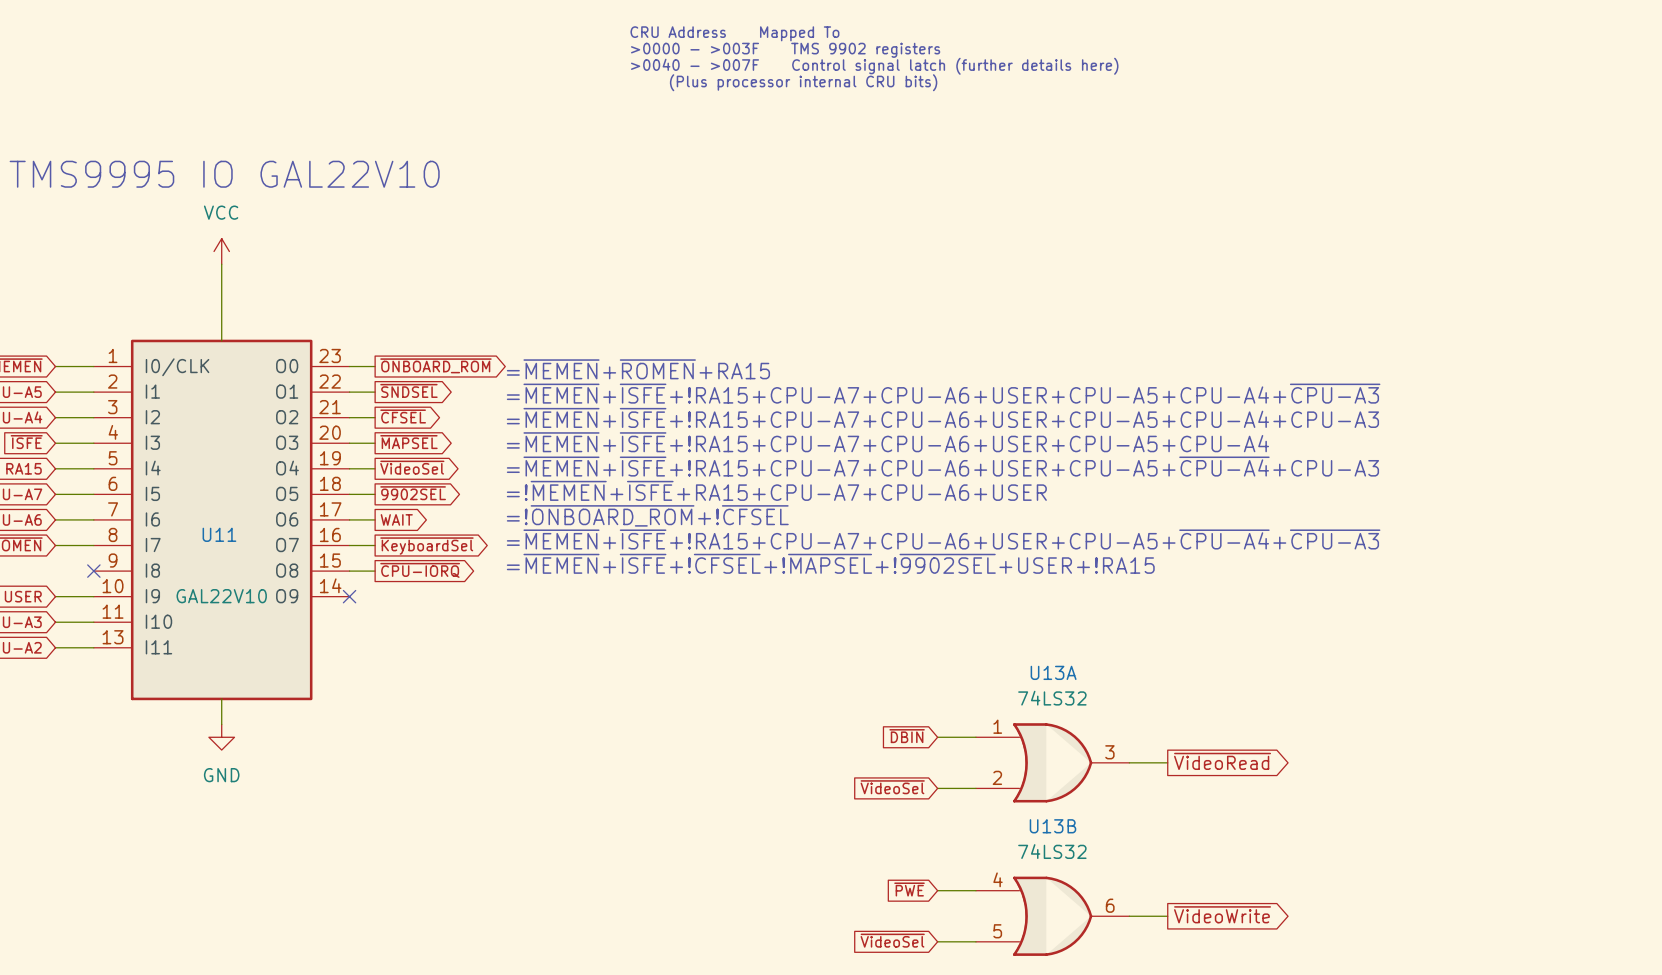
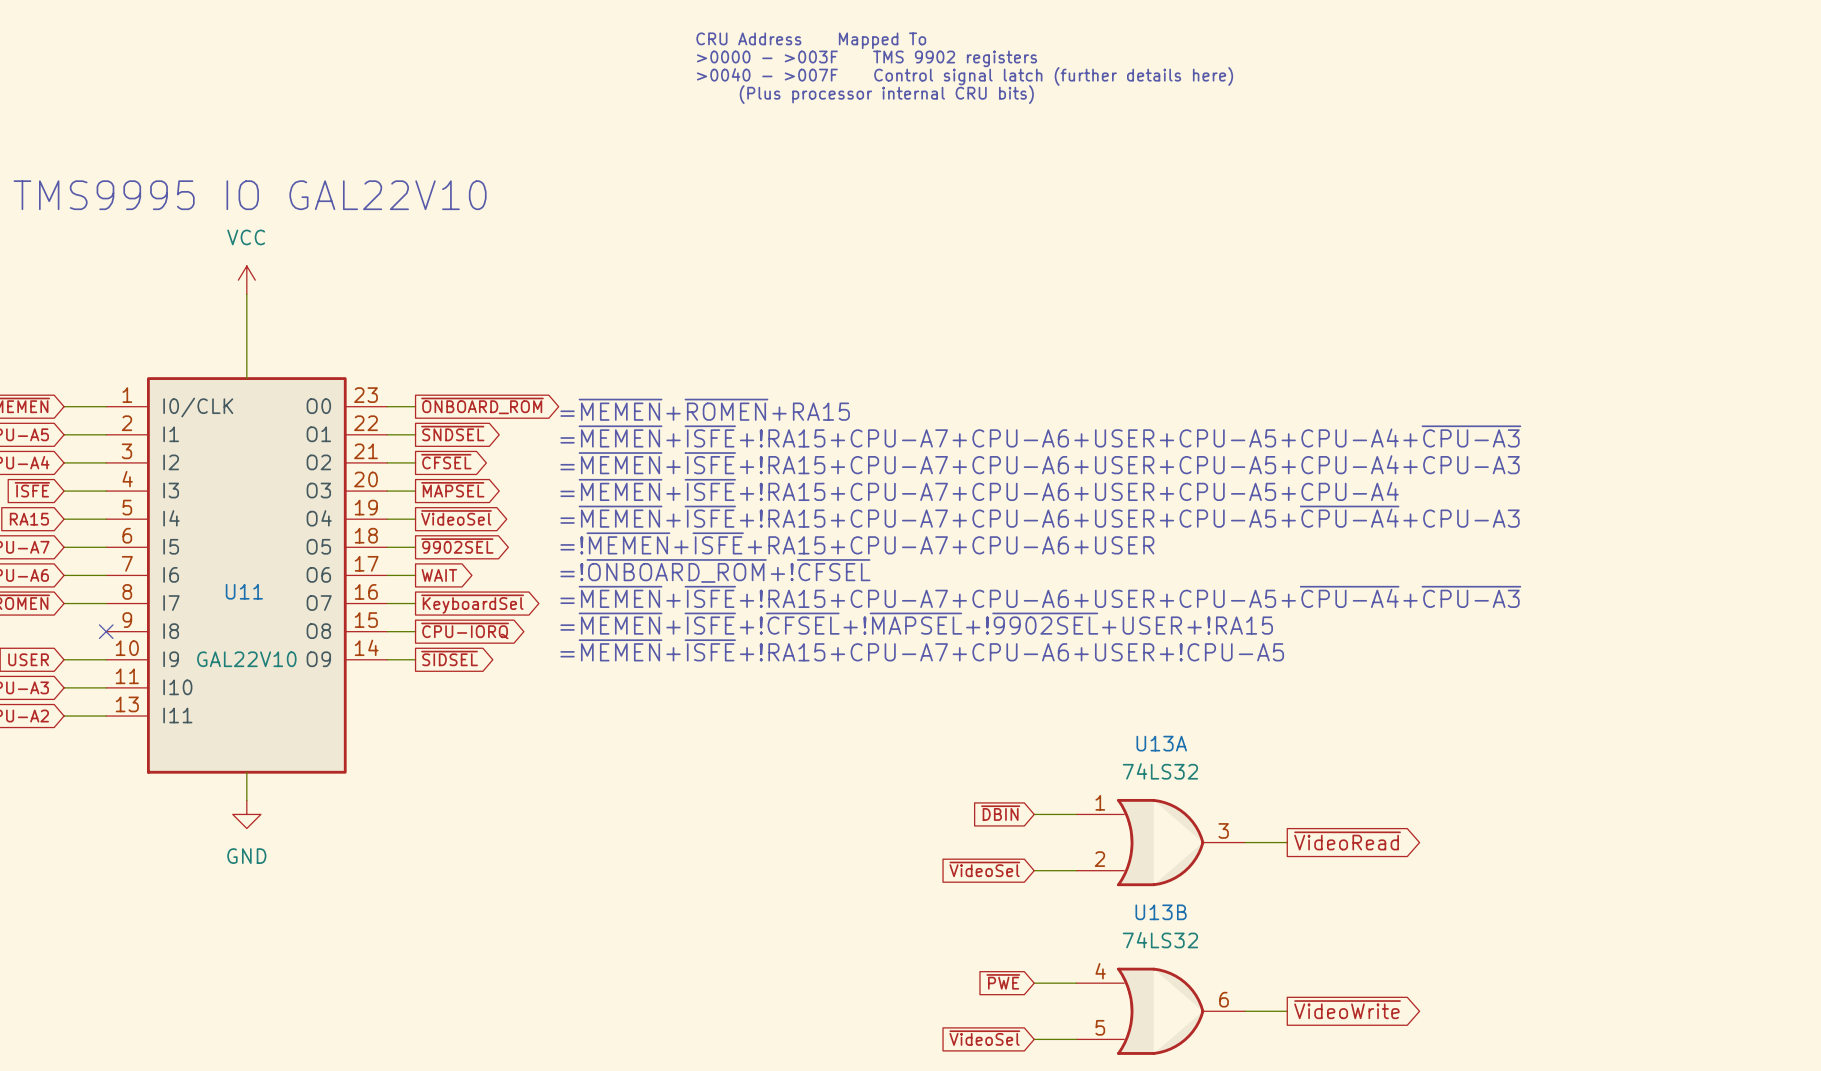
text: none -> =~{MEMEN}+~{ISFE}+!RA15+CPU-A7+CPU-A6+USER+!CPU-A5 (922, 650)
global label: none -> ~{SIDSEL} (449, 658)
wire: none -> (387, 659) (415, 659)
no-connect mark: (349, 596) -> none

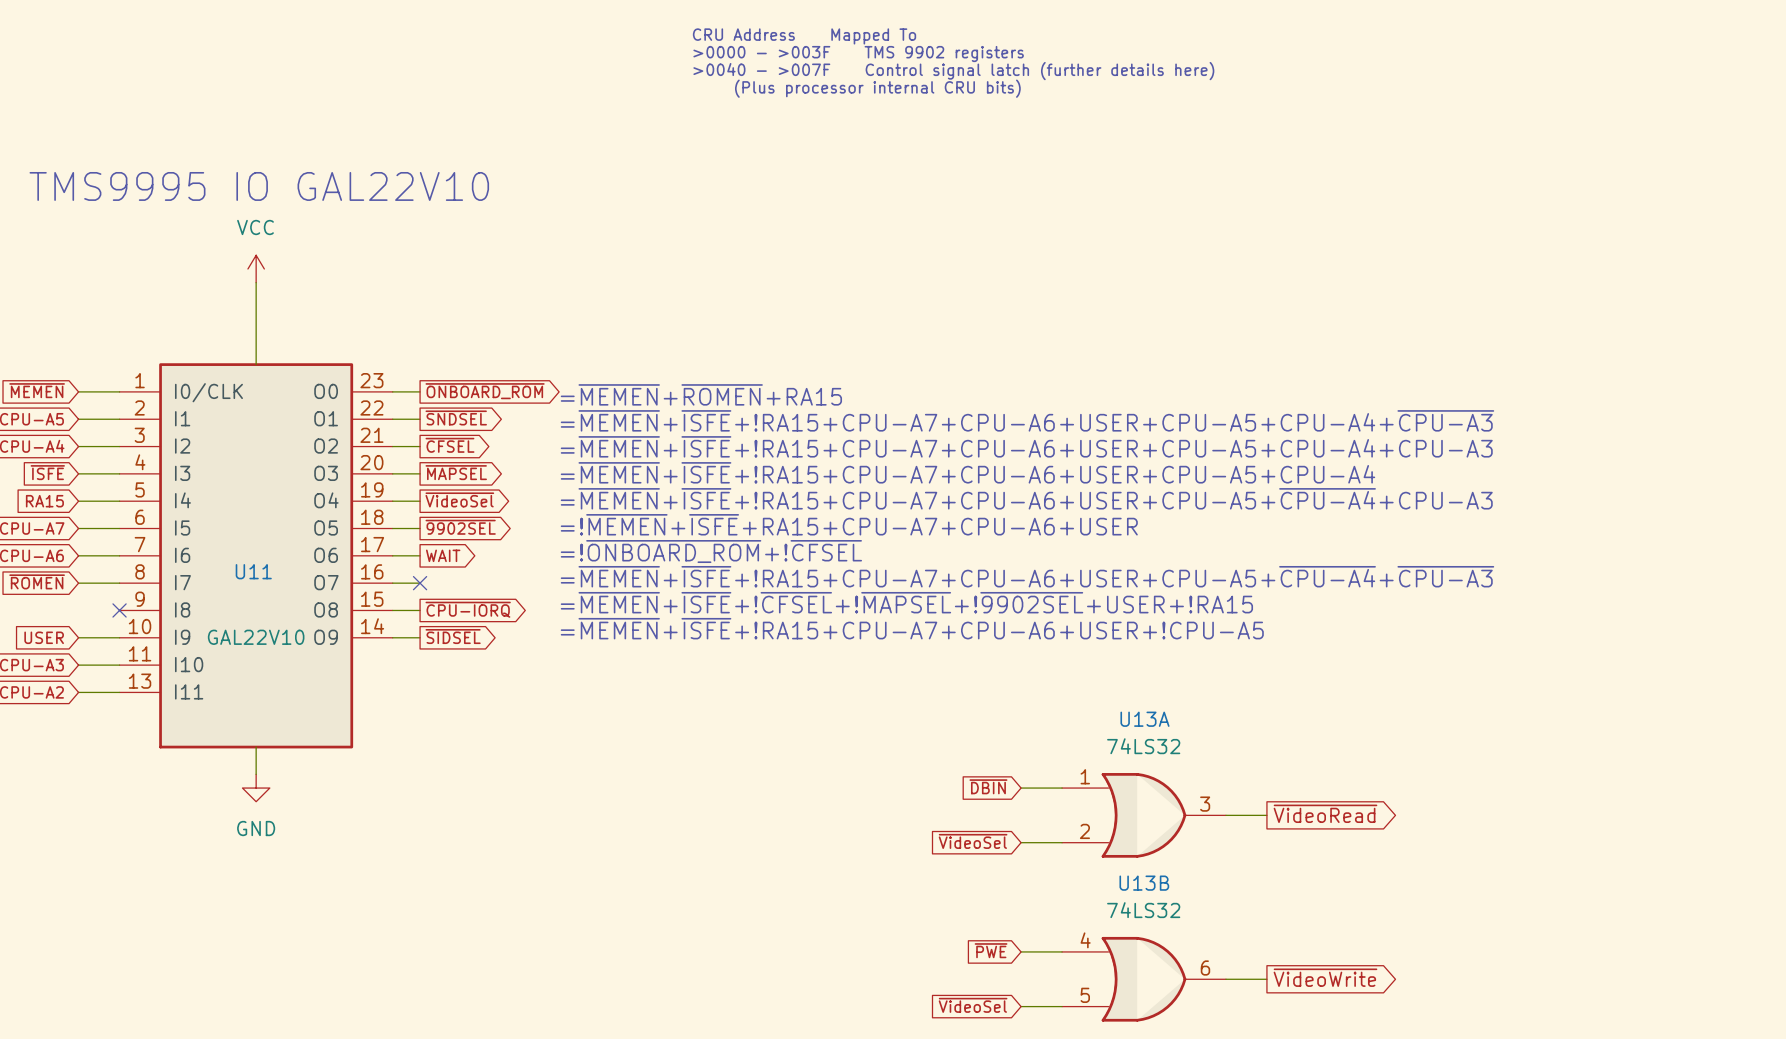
no-connect mark: none -> (420, 583)
global label: ~{KeyboardSel} (472, 604) -> none

